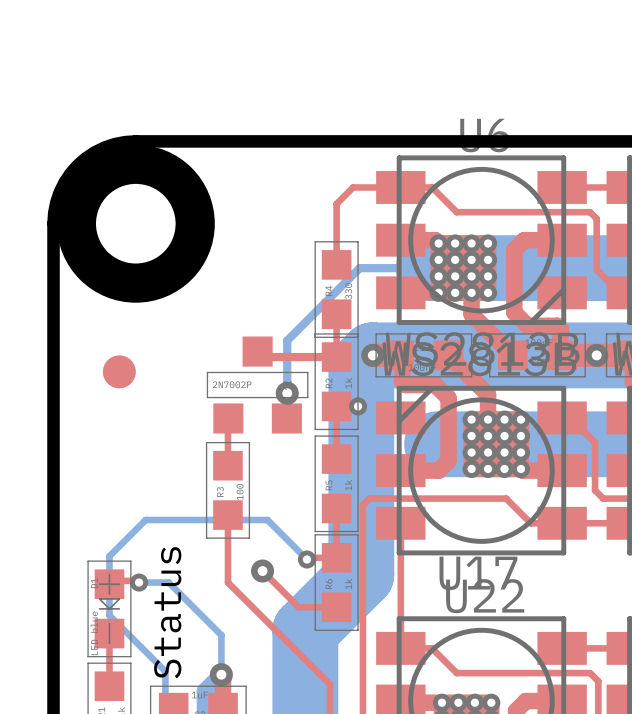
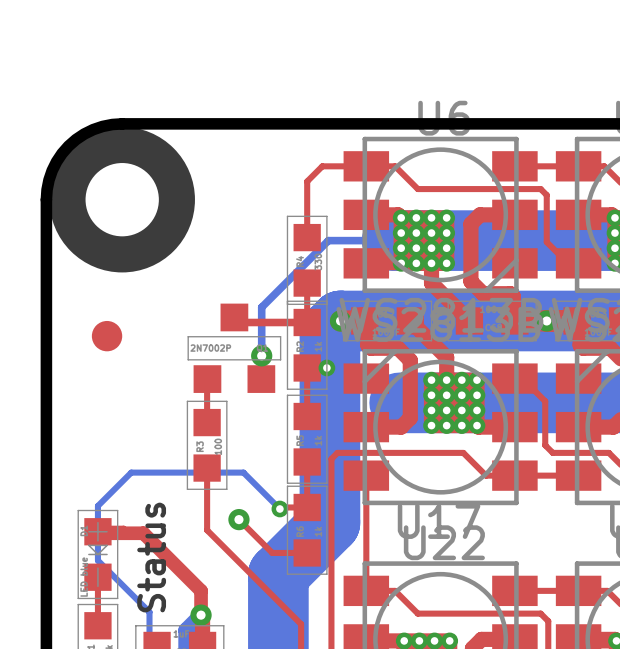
bottom track: (139, 582) (168, 582) (221, 635) (221, 674) -> none
via: (139, 582) -> none
top track: none -> (97, 533) (143, 533) (201, 590) (201, 615)

